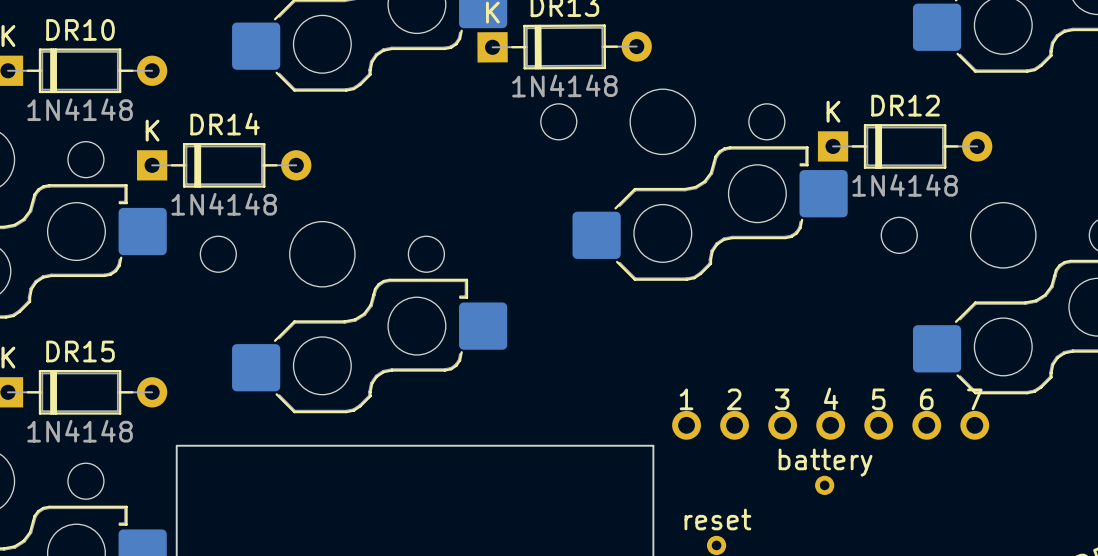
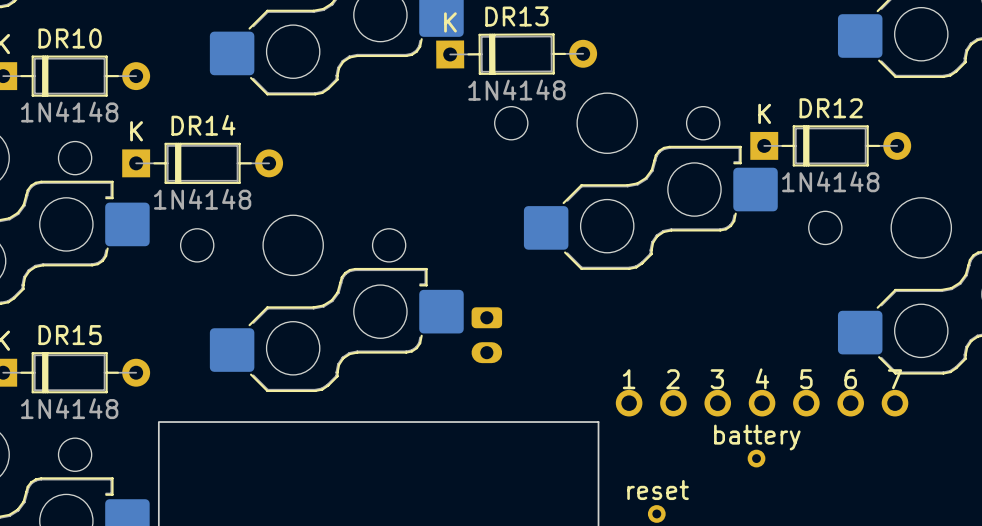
part: none -> (486, 335)

